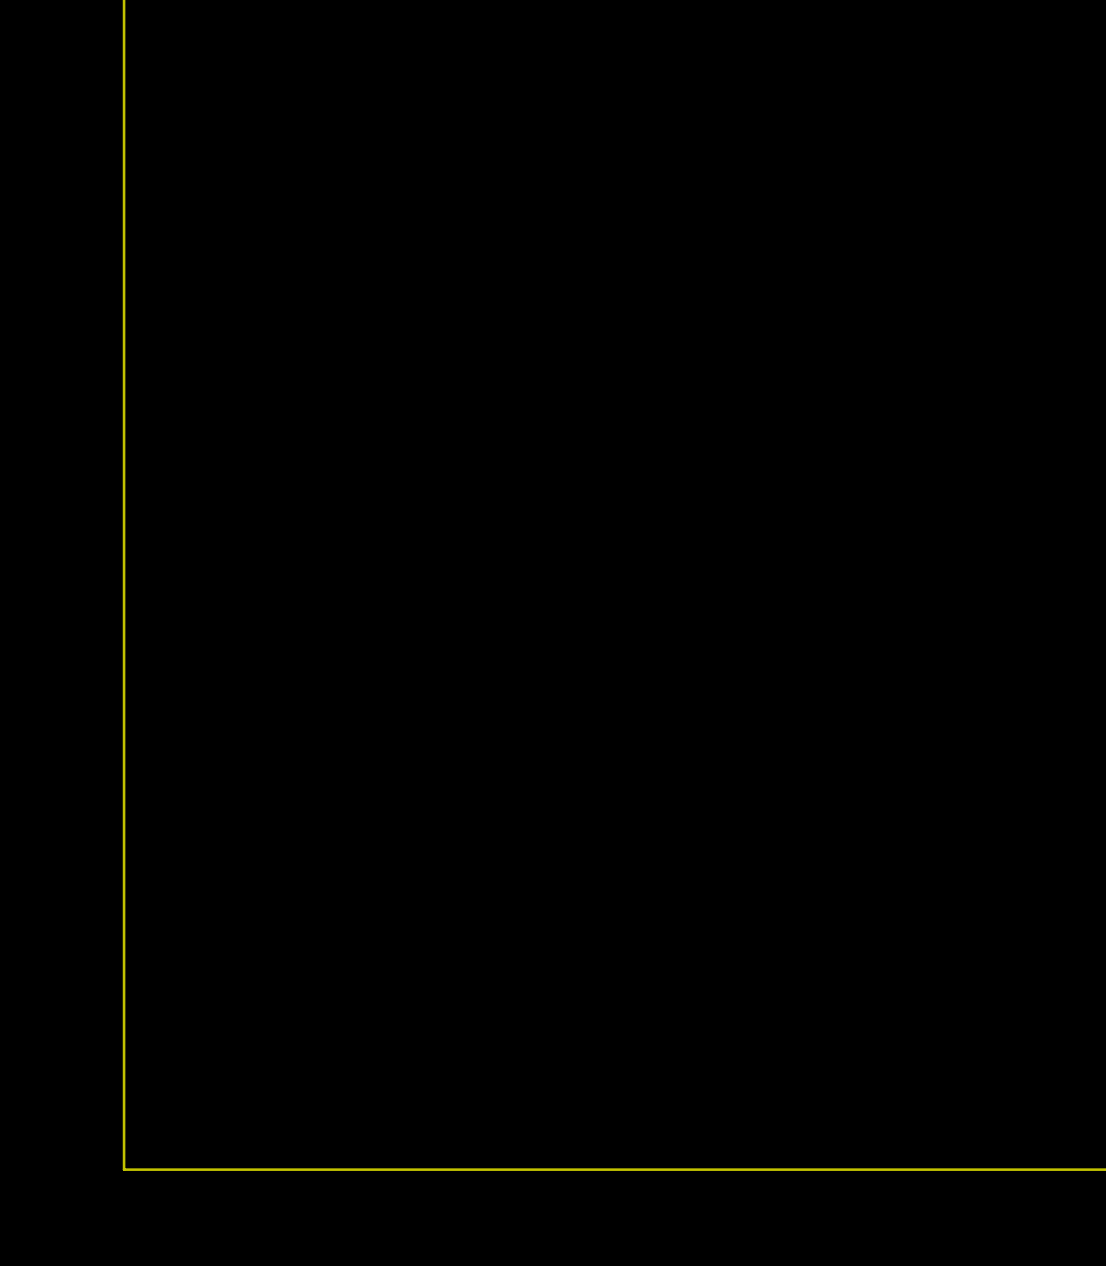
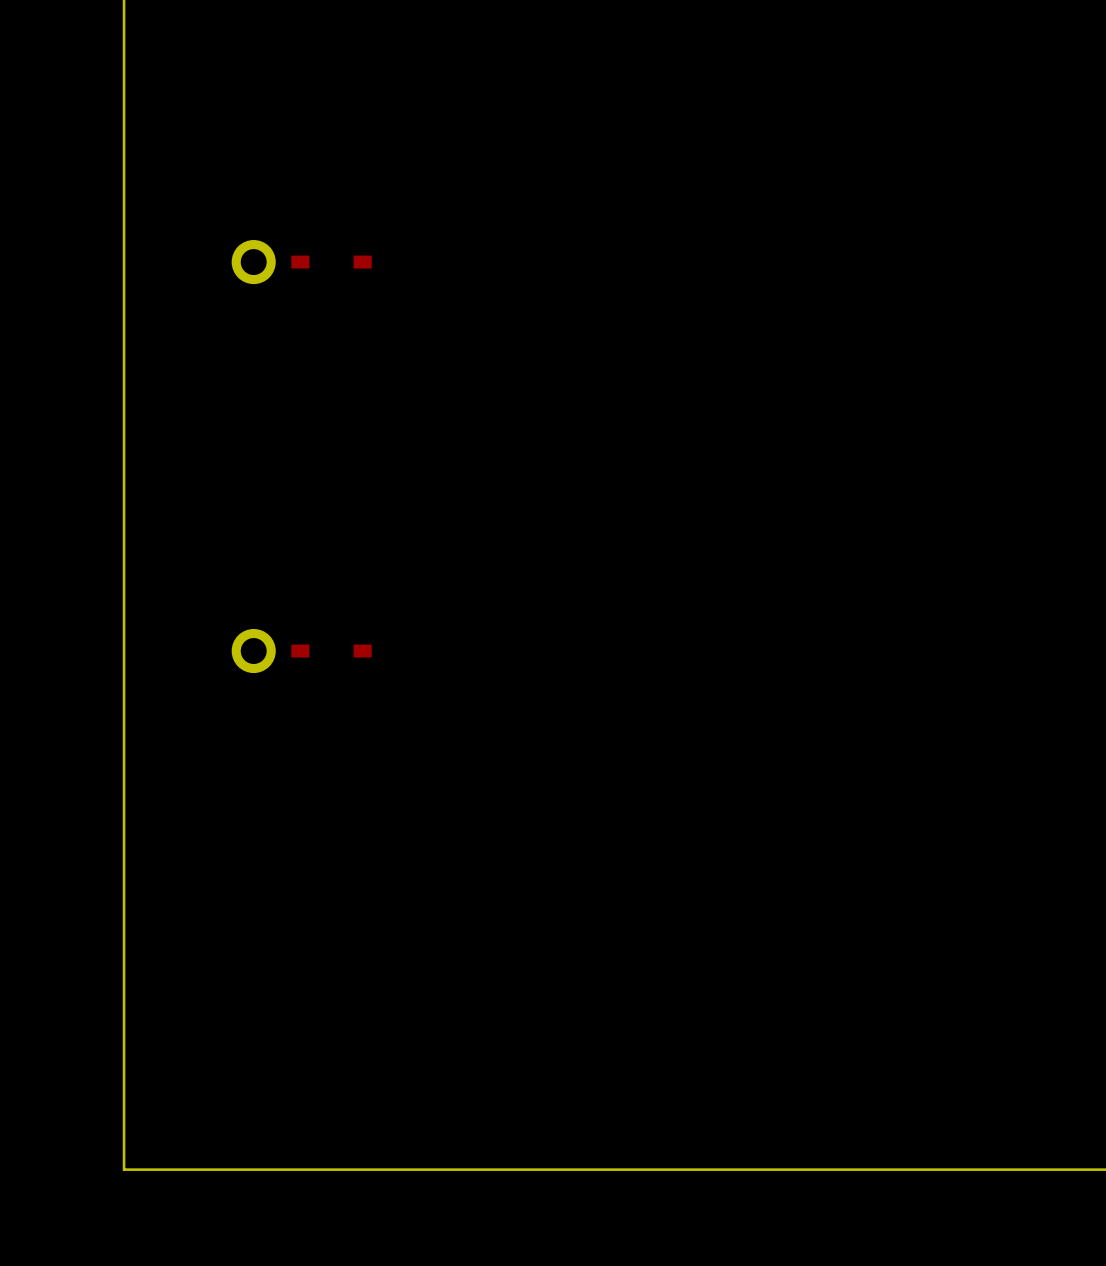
part: none -> (253, 262)
part: none -> (331, 262)
part: none -> (253, 651)
part: none -> (331, 651)

